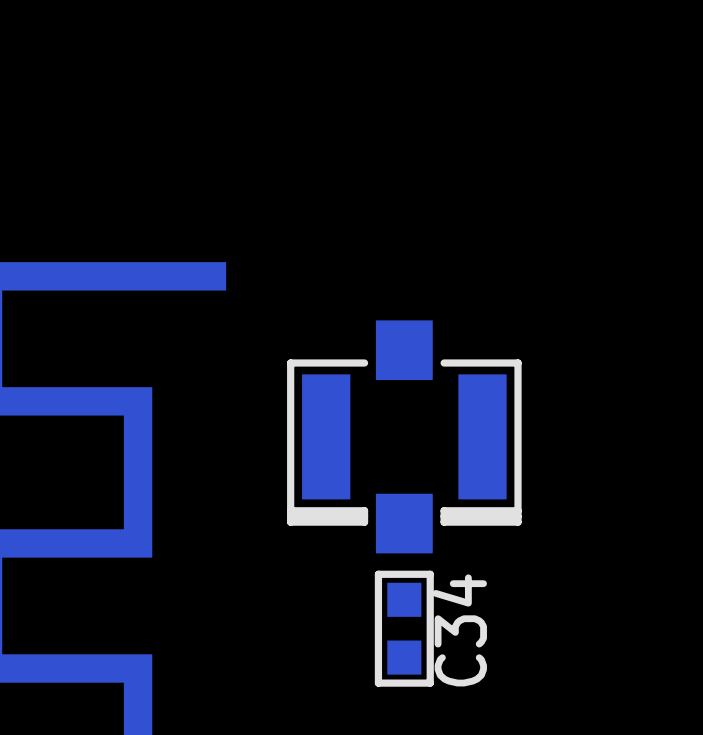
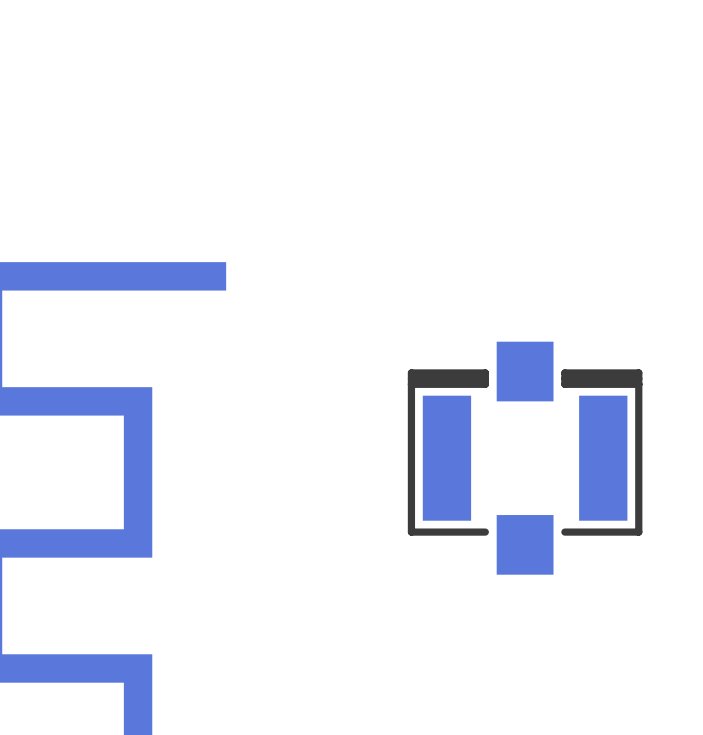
part rotation: 0° (404, 436) -> 180° (525, 458)
C34: (404, 628) -> none

